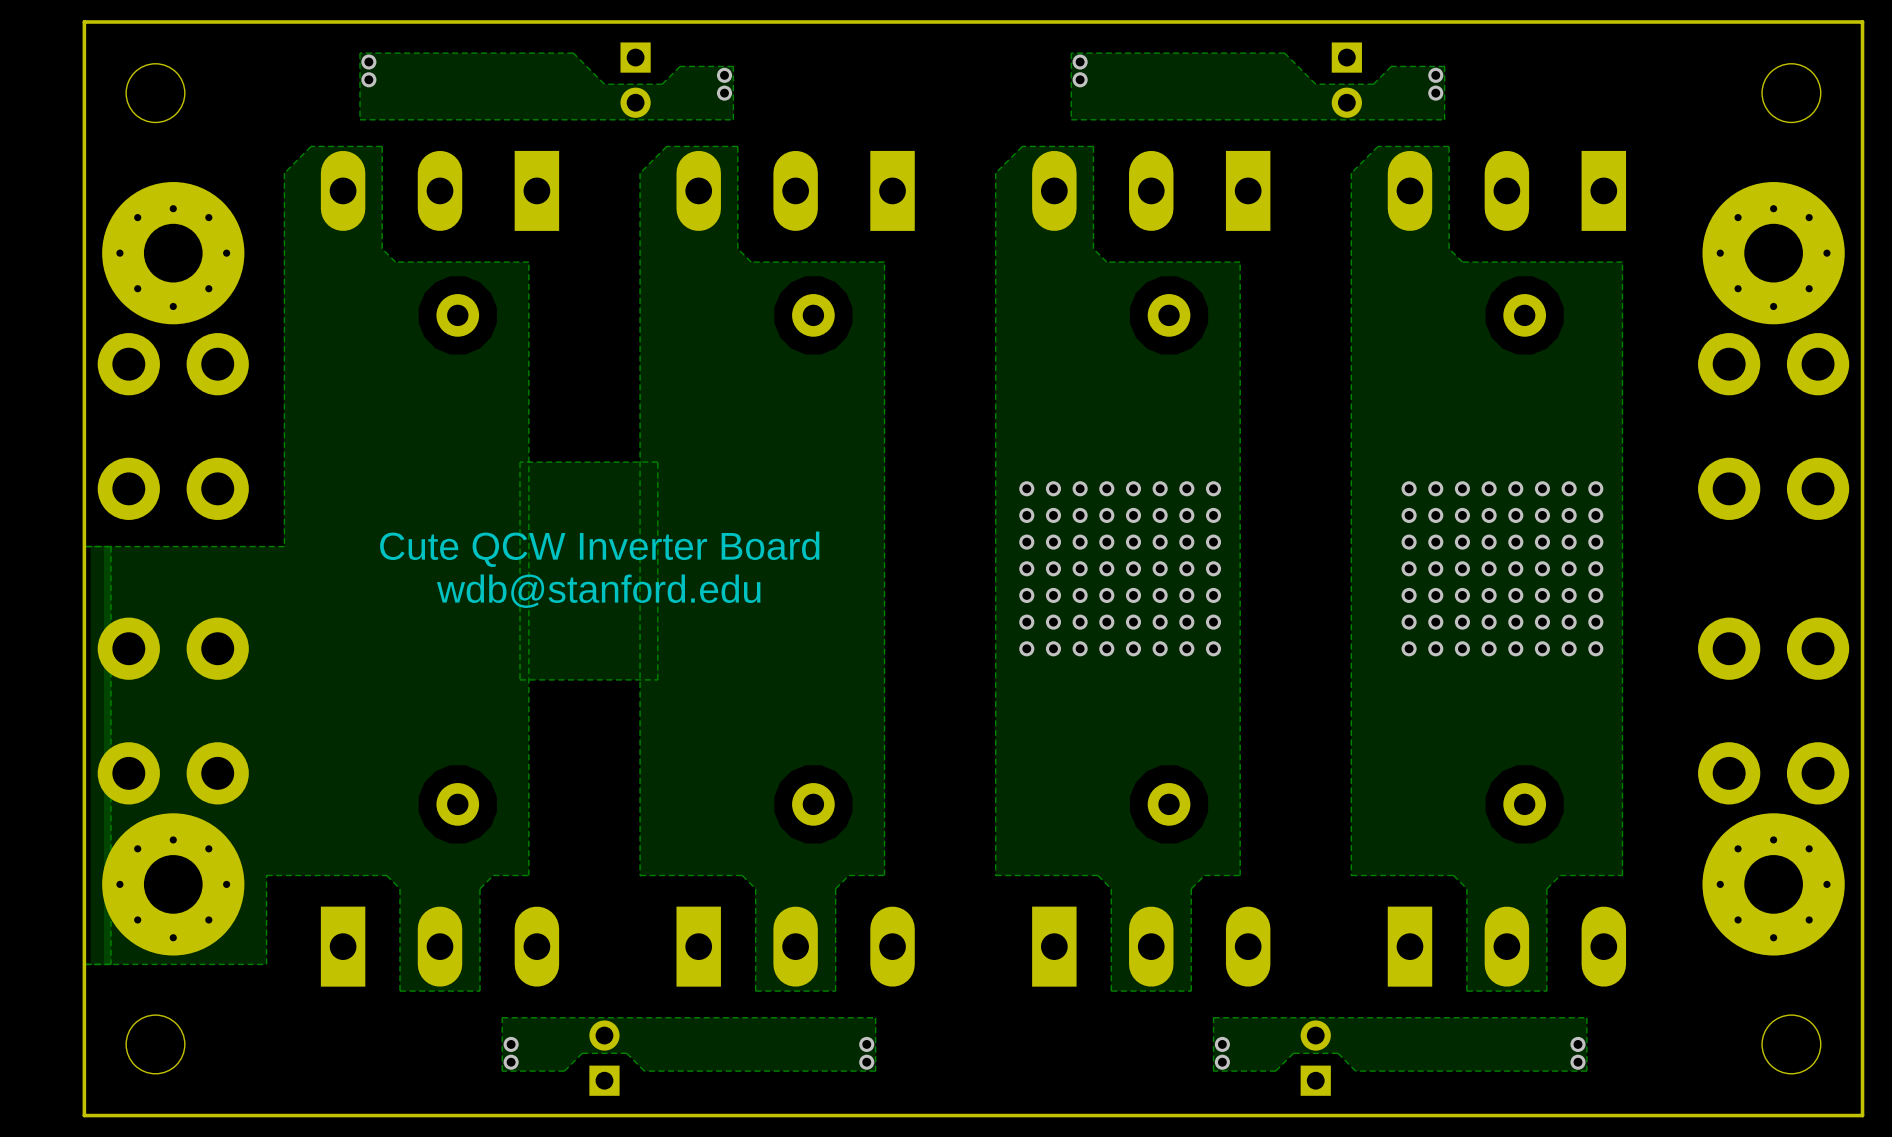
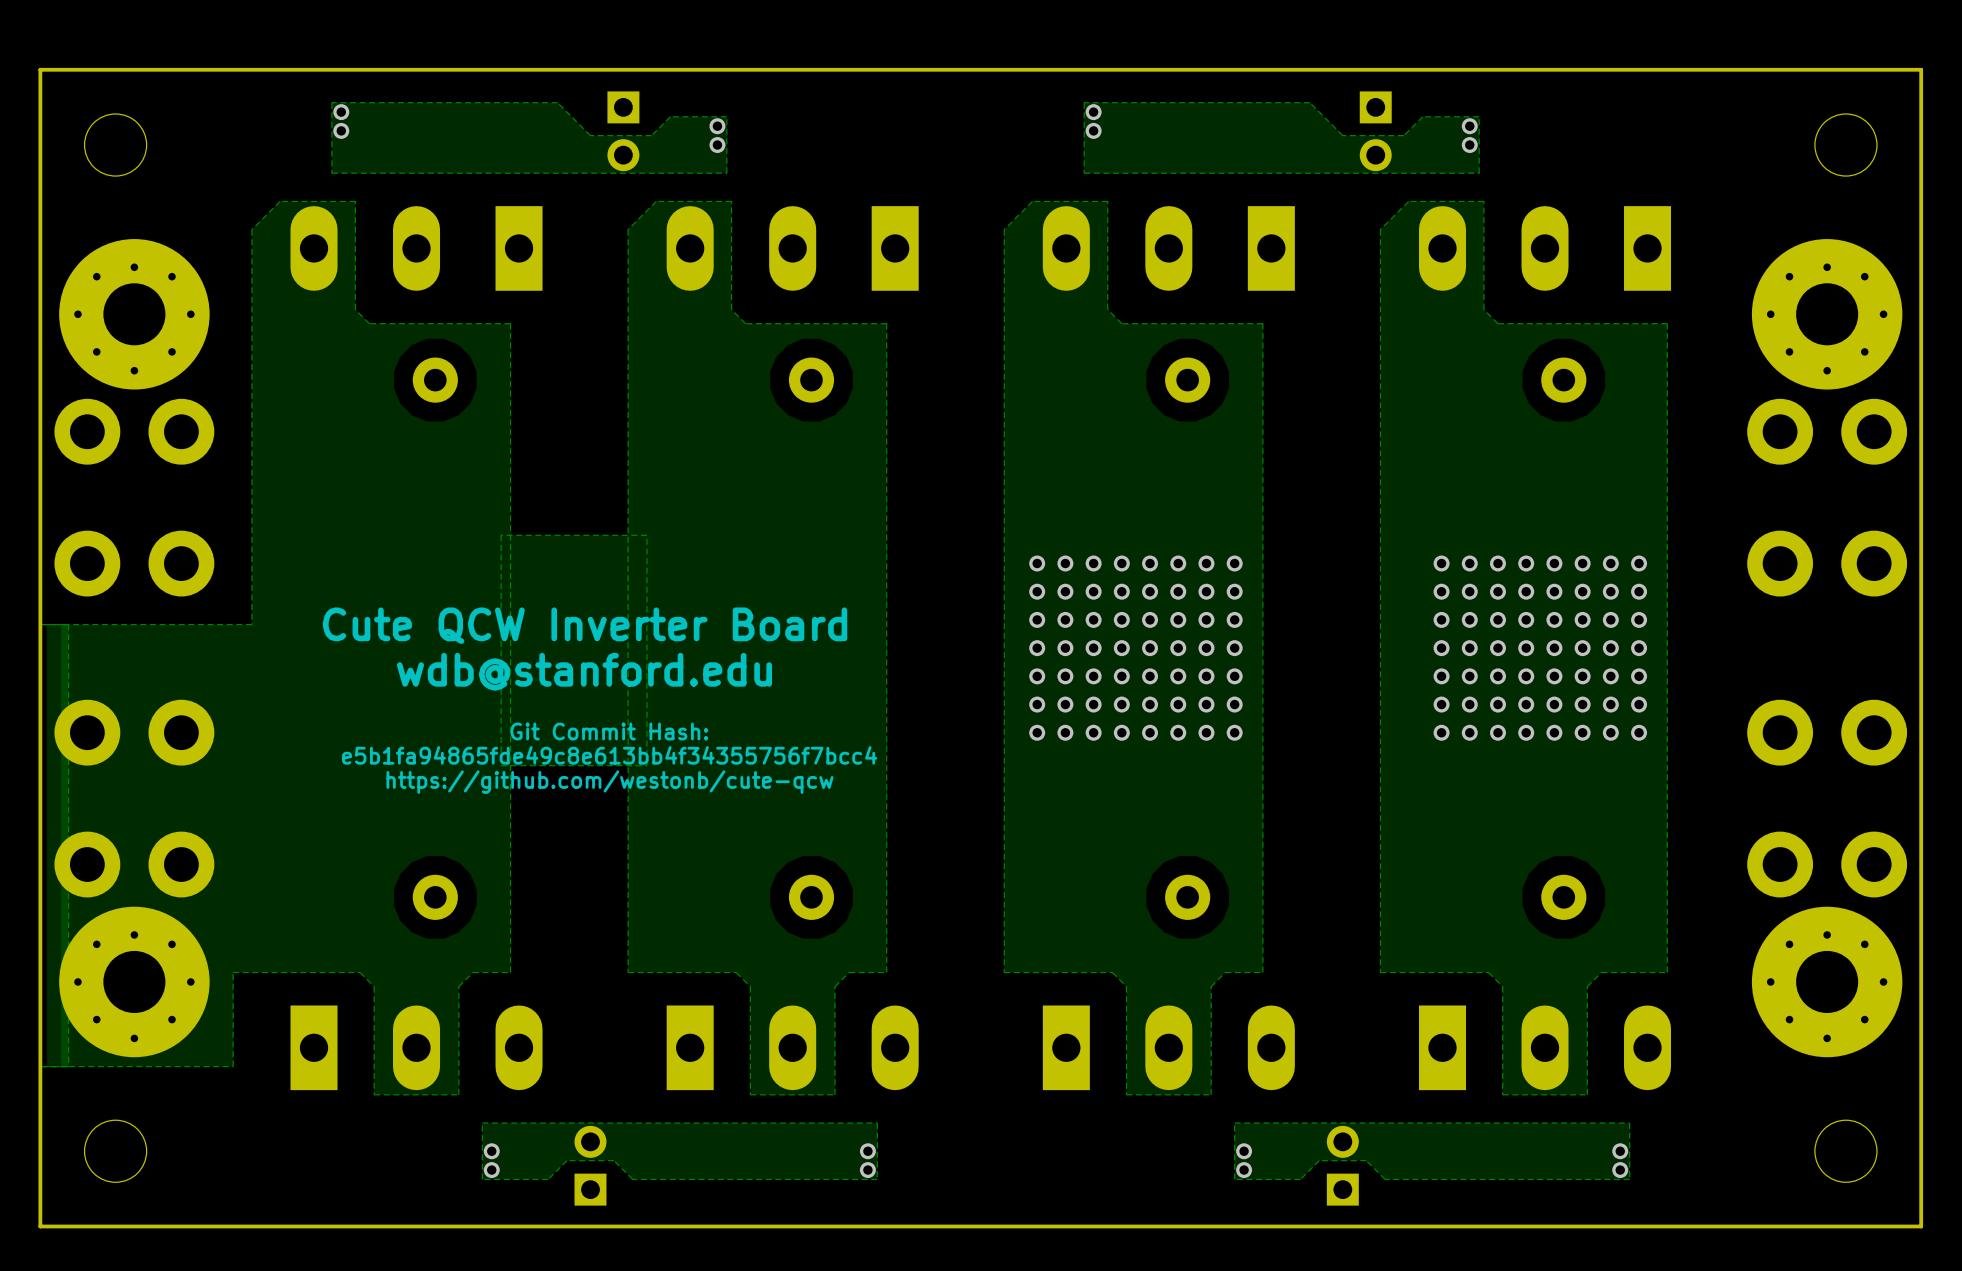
text: none -> Git Commit Hash: (609, 731)
text: none -> e5b1fa94865fde49c8e613bb4f34355756f7bcc4 (609, 755)
text: none -> https://github.com/westonb/cute-qcw (610, 782)

